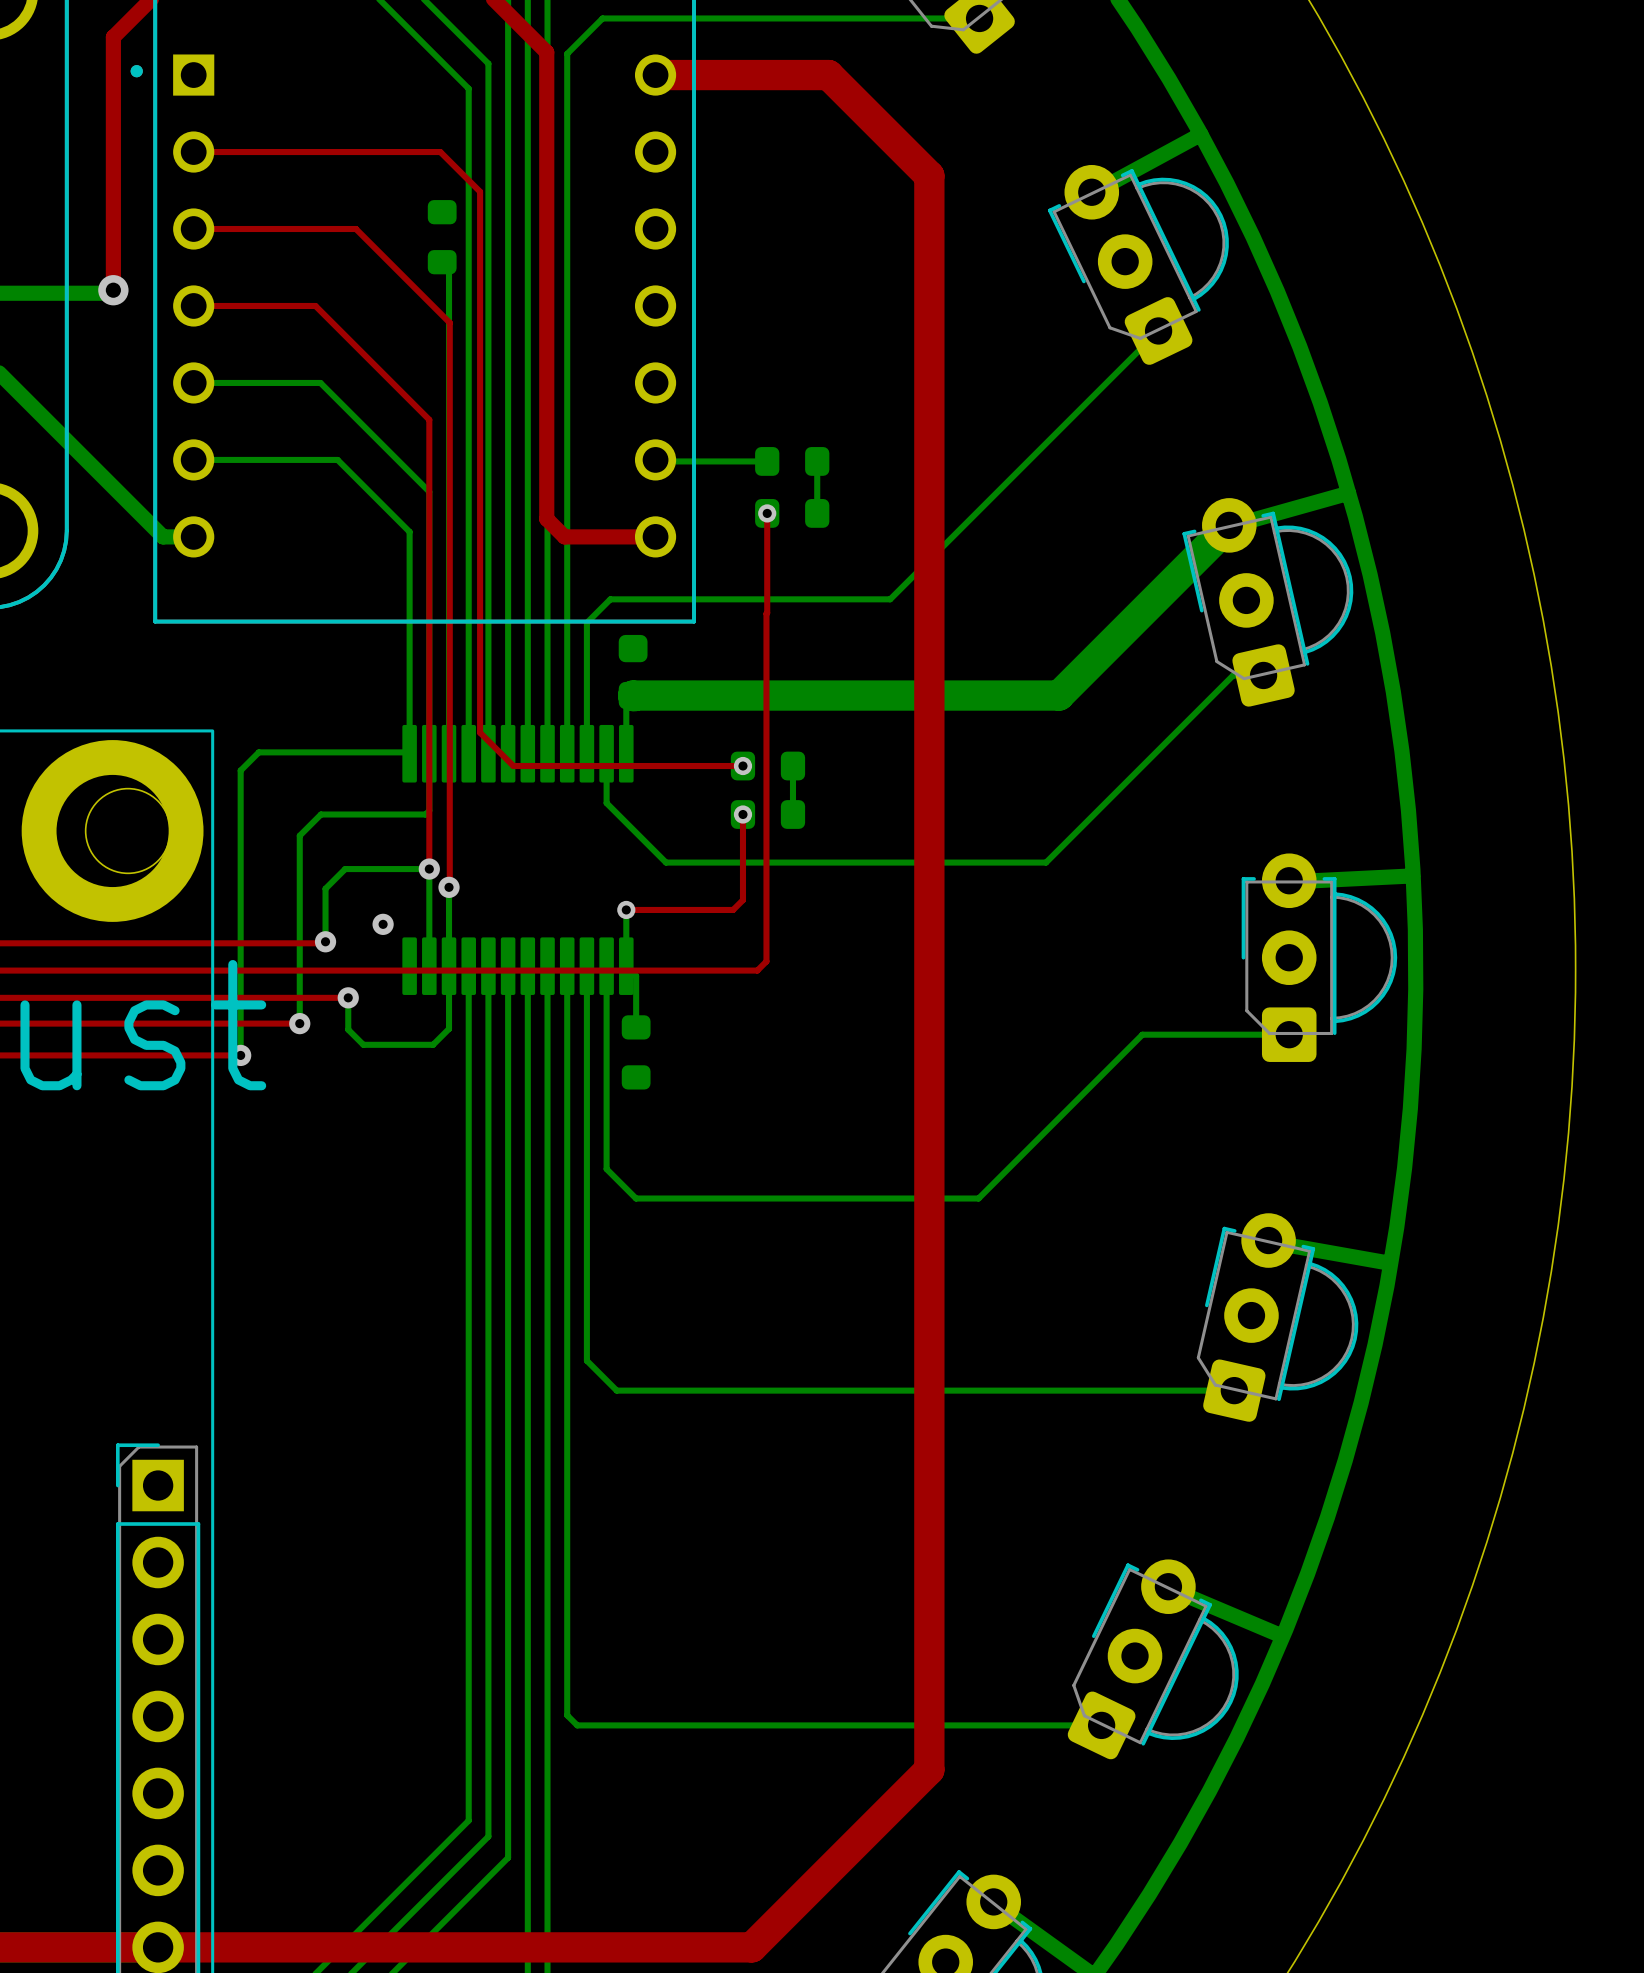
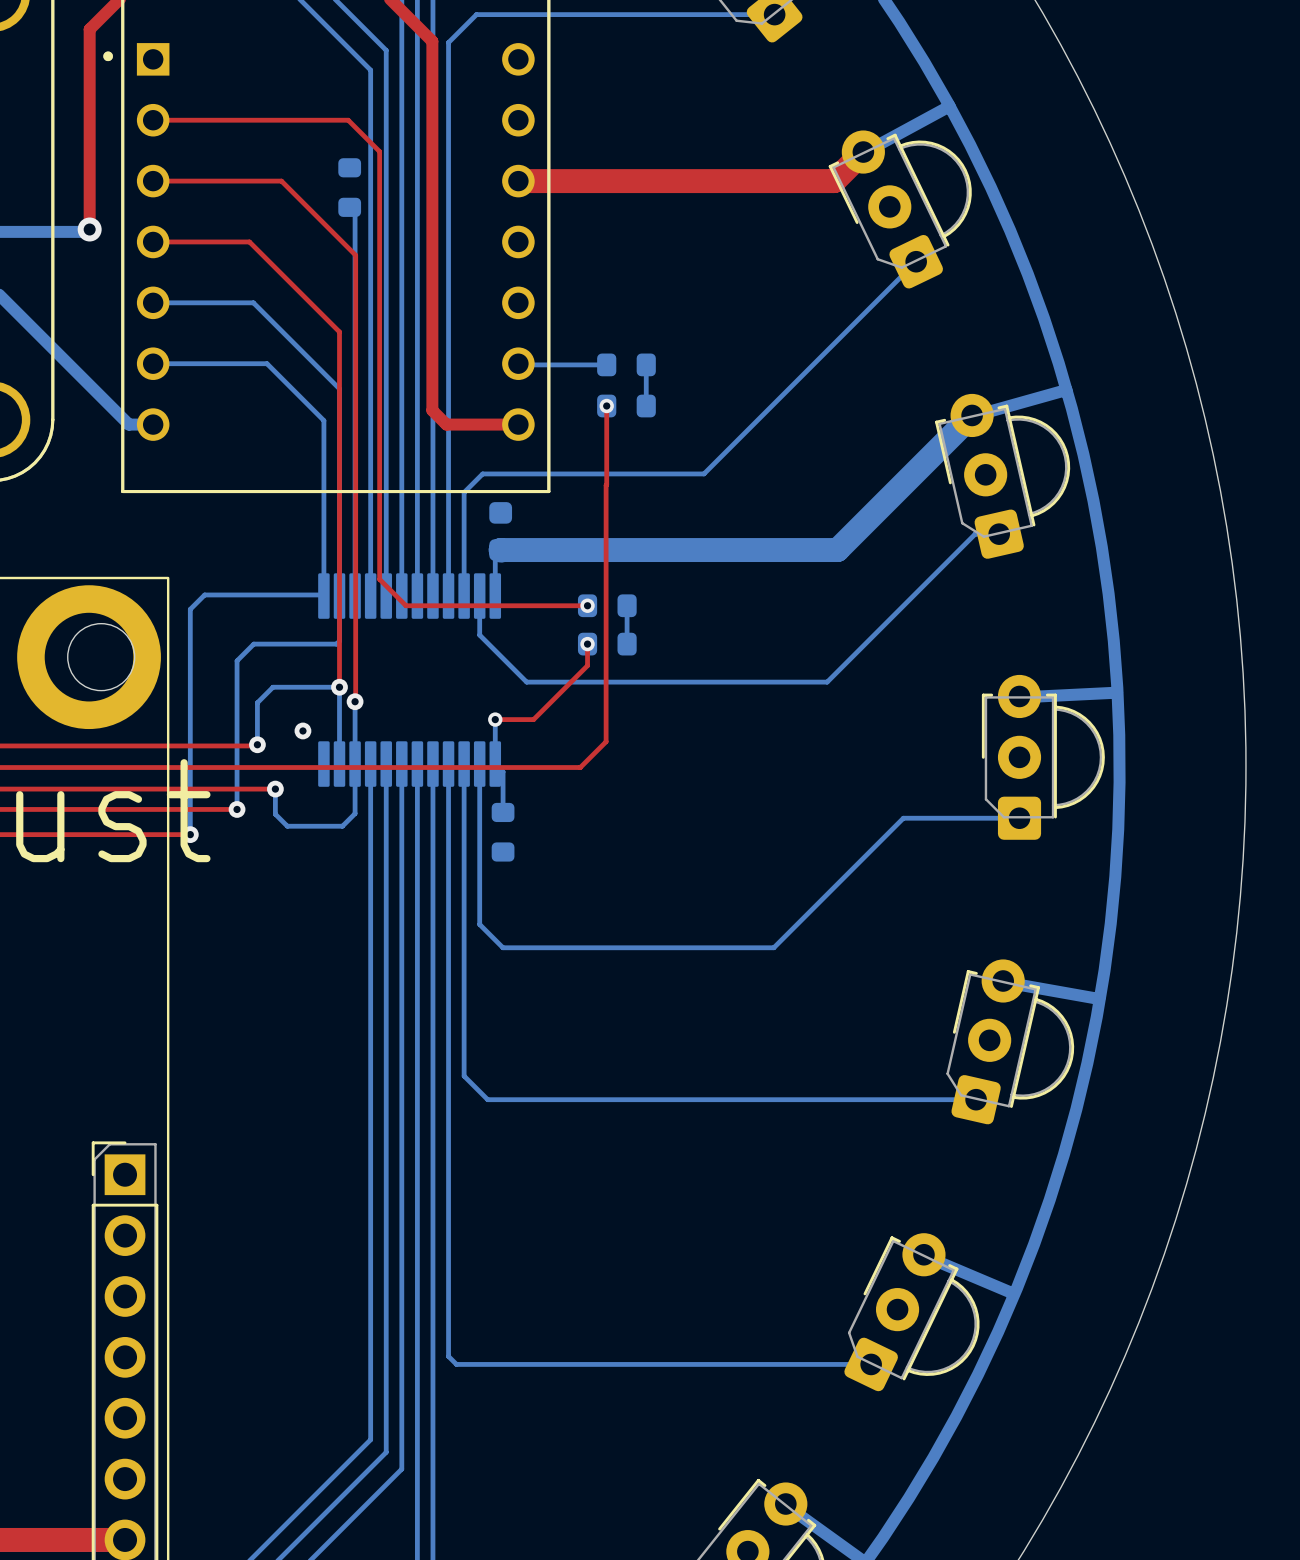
top track: (655, 75) (828, 75) (929, 175) (929, 1769) (751, 1947) (158, 1947) -> none
top track: none -> (863, 152) (834, 181) (518, 181)
top track: (742, 841) (742, 900) (733, 909) (674, 909) -> (587, 665) (533, 719)
top track: (766, 937) (766, 961) (757, 970) (733, 970) -> (606, 741) (580, 767)

